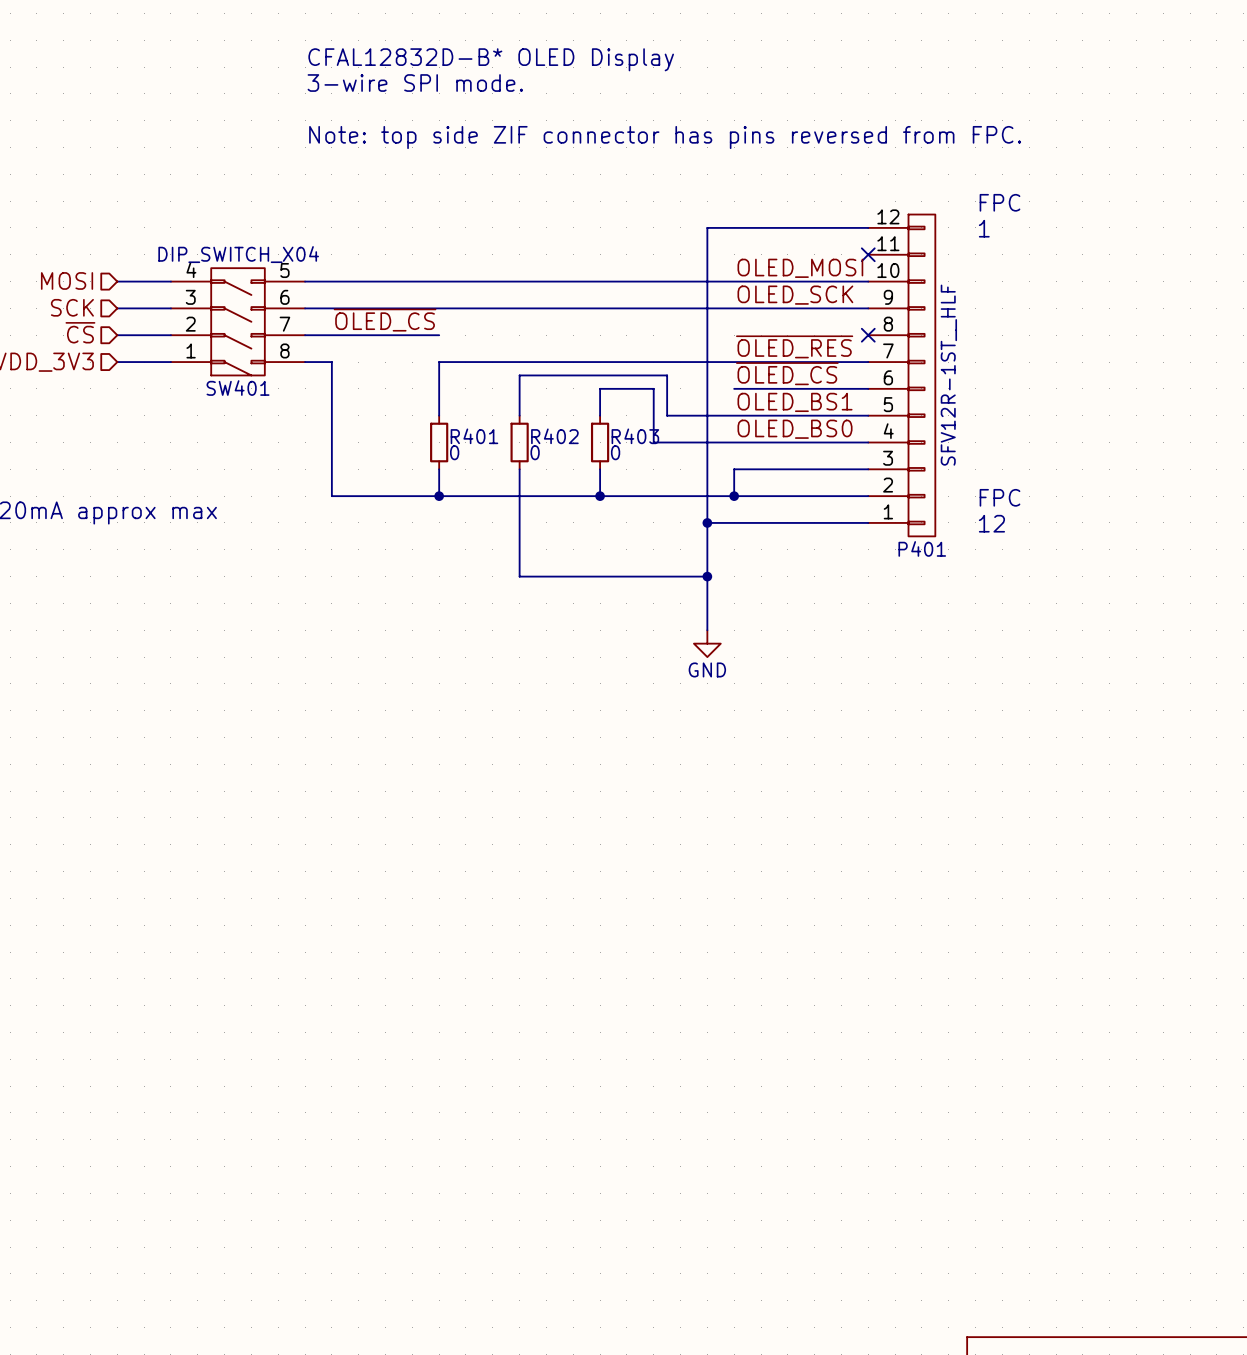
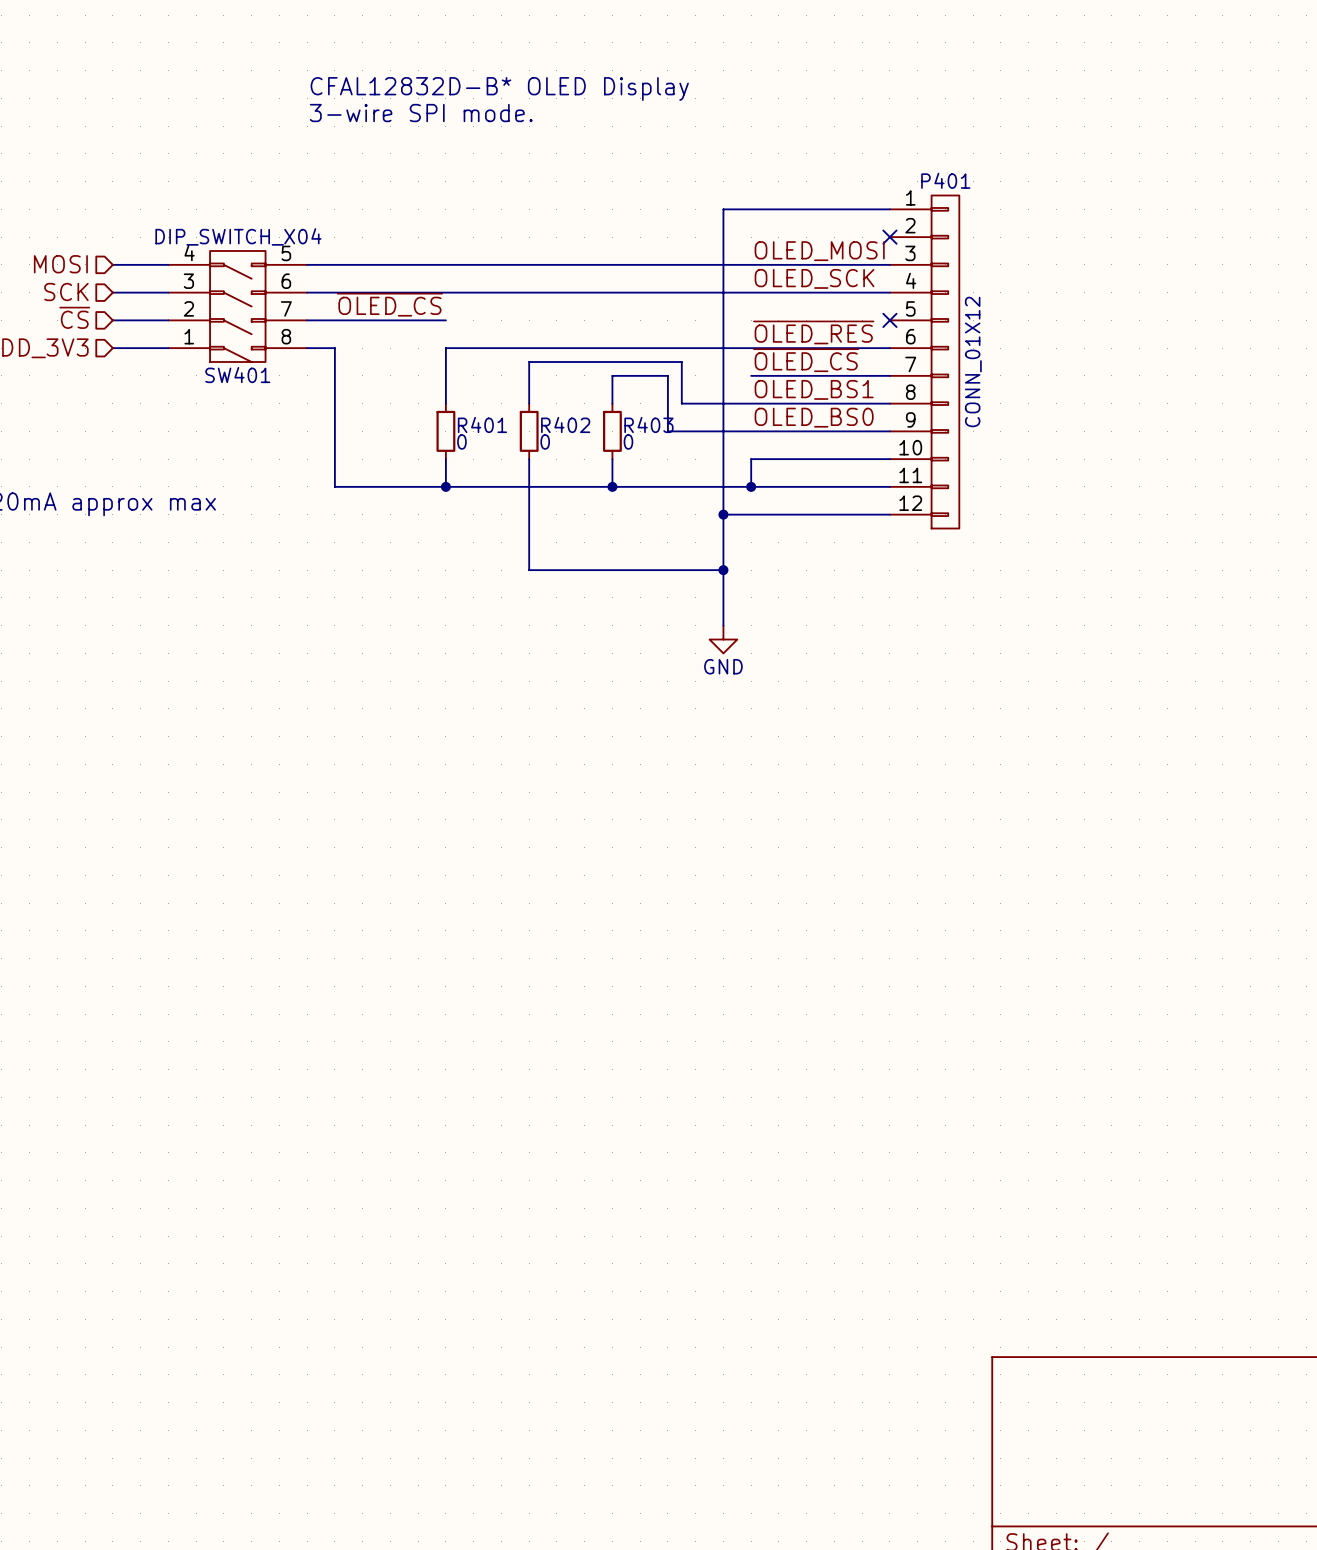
text position: CFAL12832D-B* OLED Display (491, 59) -> CFAL12832D-B* OLED Display (499, 88)
text: 3-wire SPI mode. (415, 83) -> none
text: Note: top side ZIF connector has pins reversed from FPC. (665, 137) -> 3-wire SPI mode. (421, 113)
text: FPC (999, 202) -> none
text: 1 (984, 228) -> none
P401 flip: as is (921, 375) -> up-down (945, 362)
P401 value: SFV12R-1ST__HLF (948, 375) -> CONN_01X12 (973, 362)
text: FPC (999, 497) -> none
text: 12 (991, 523) -> none

